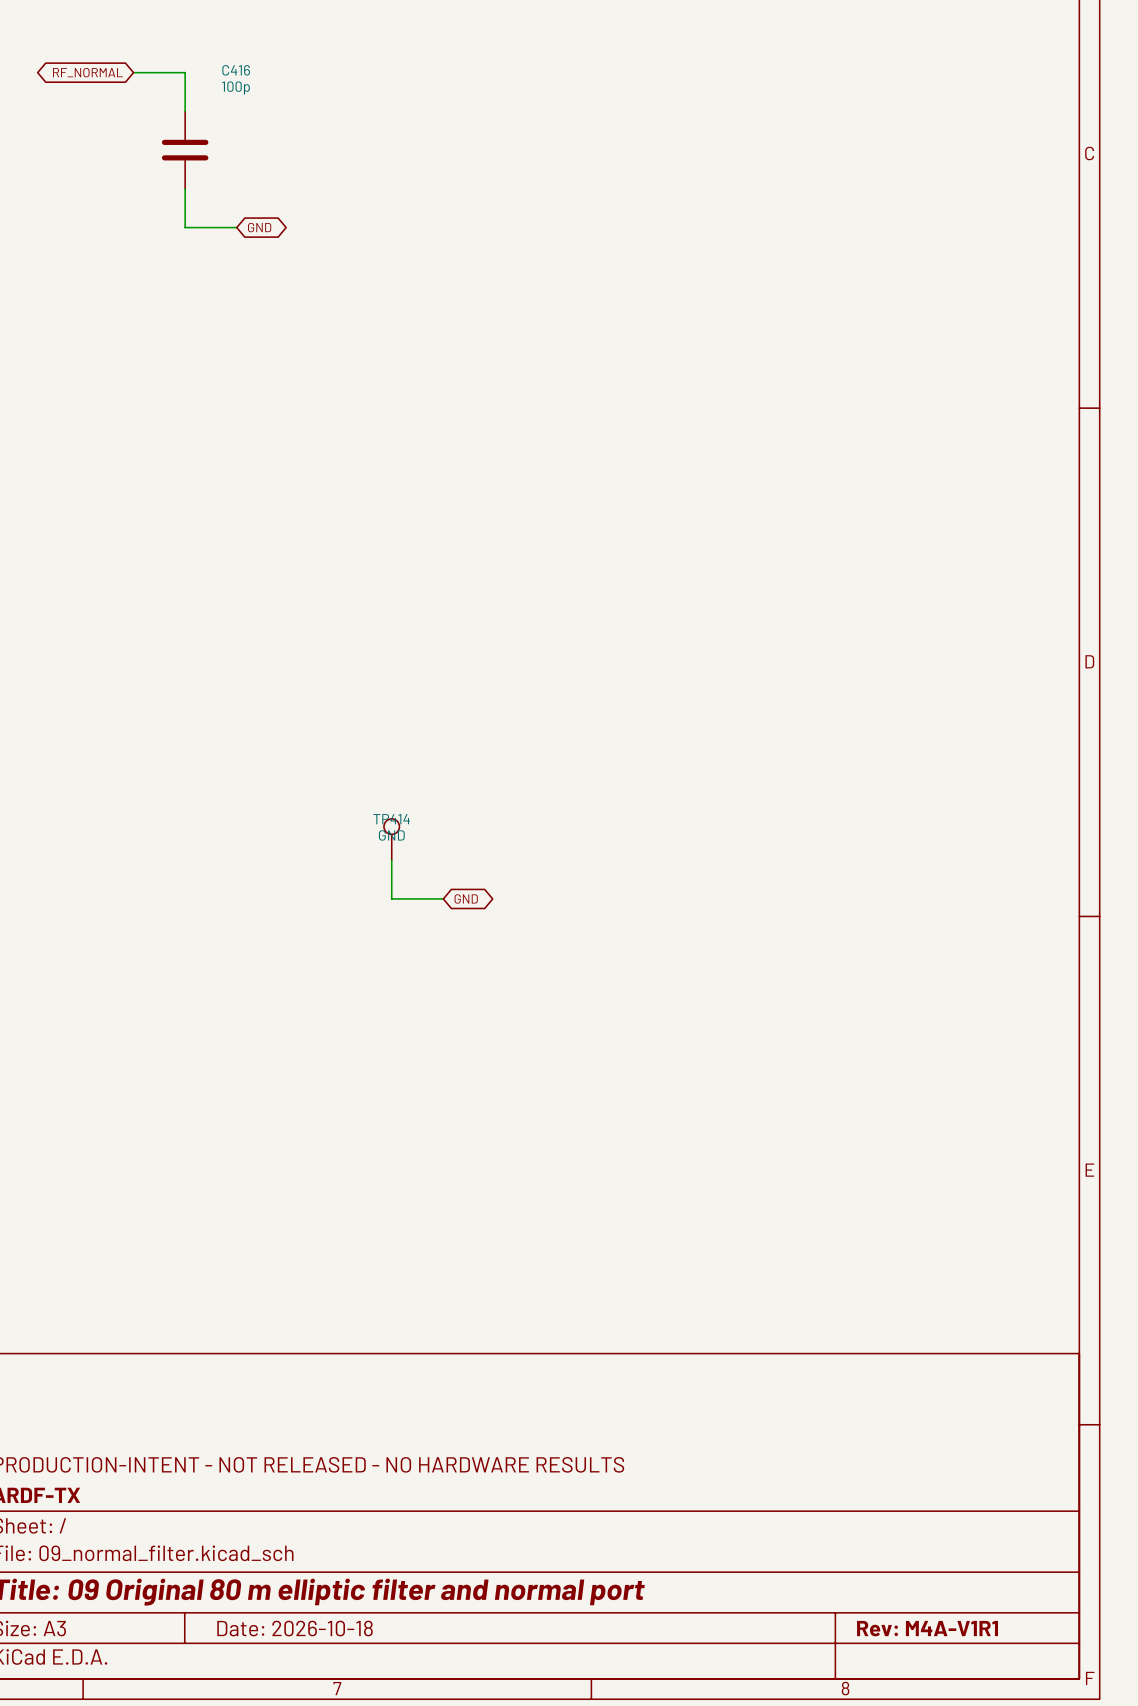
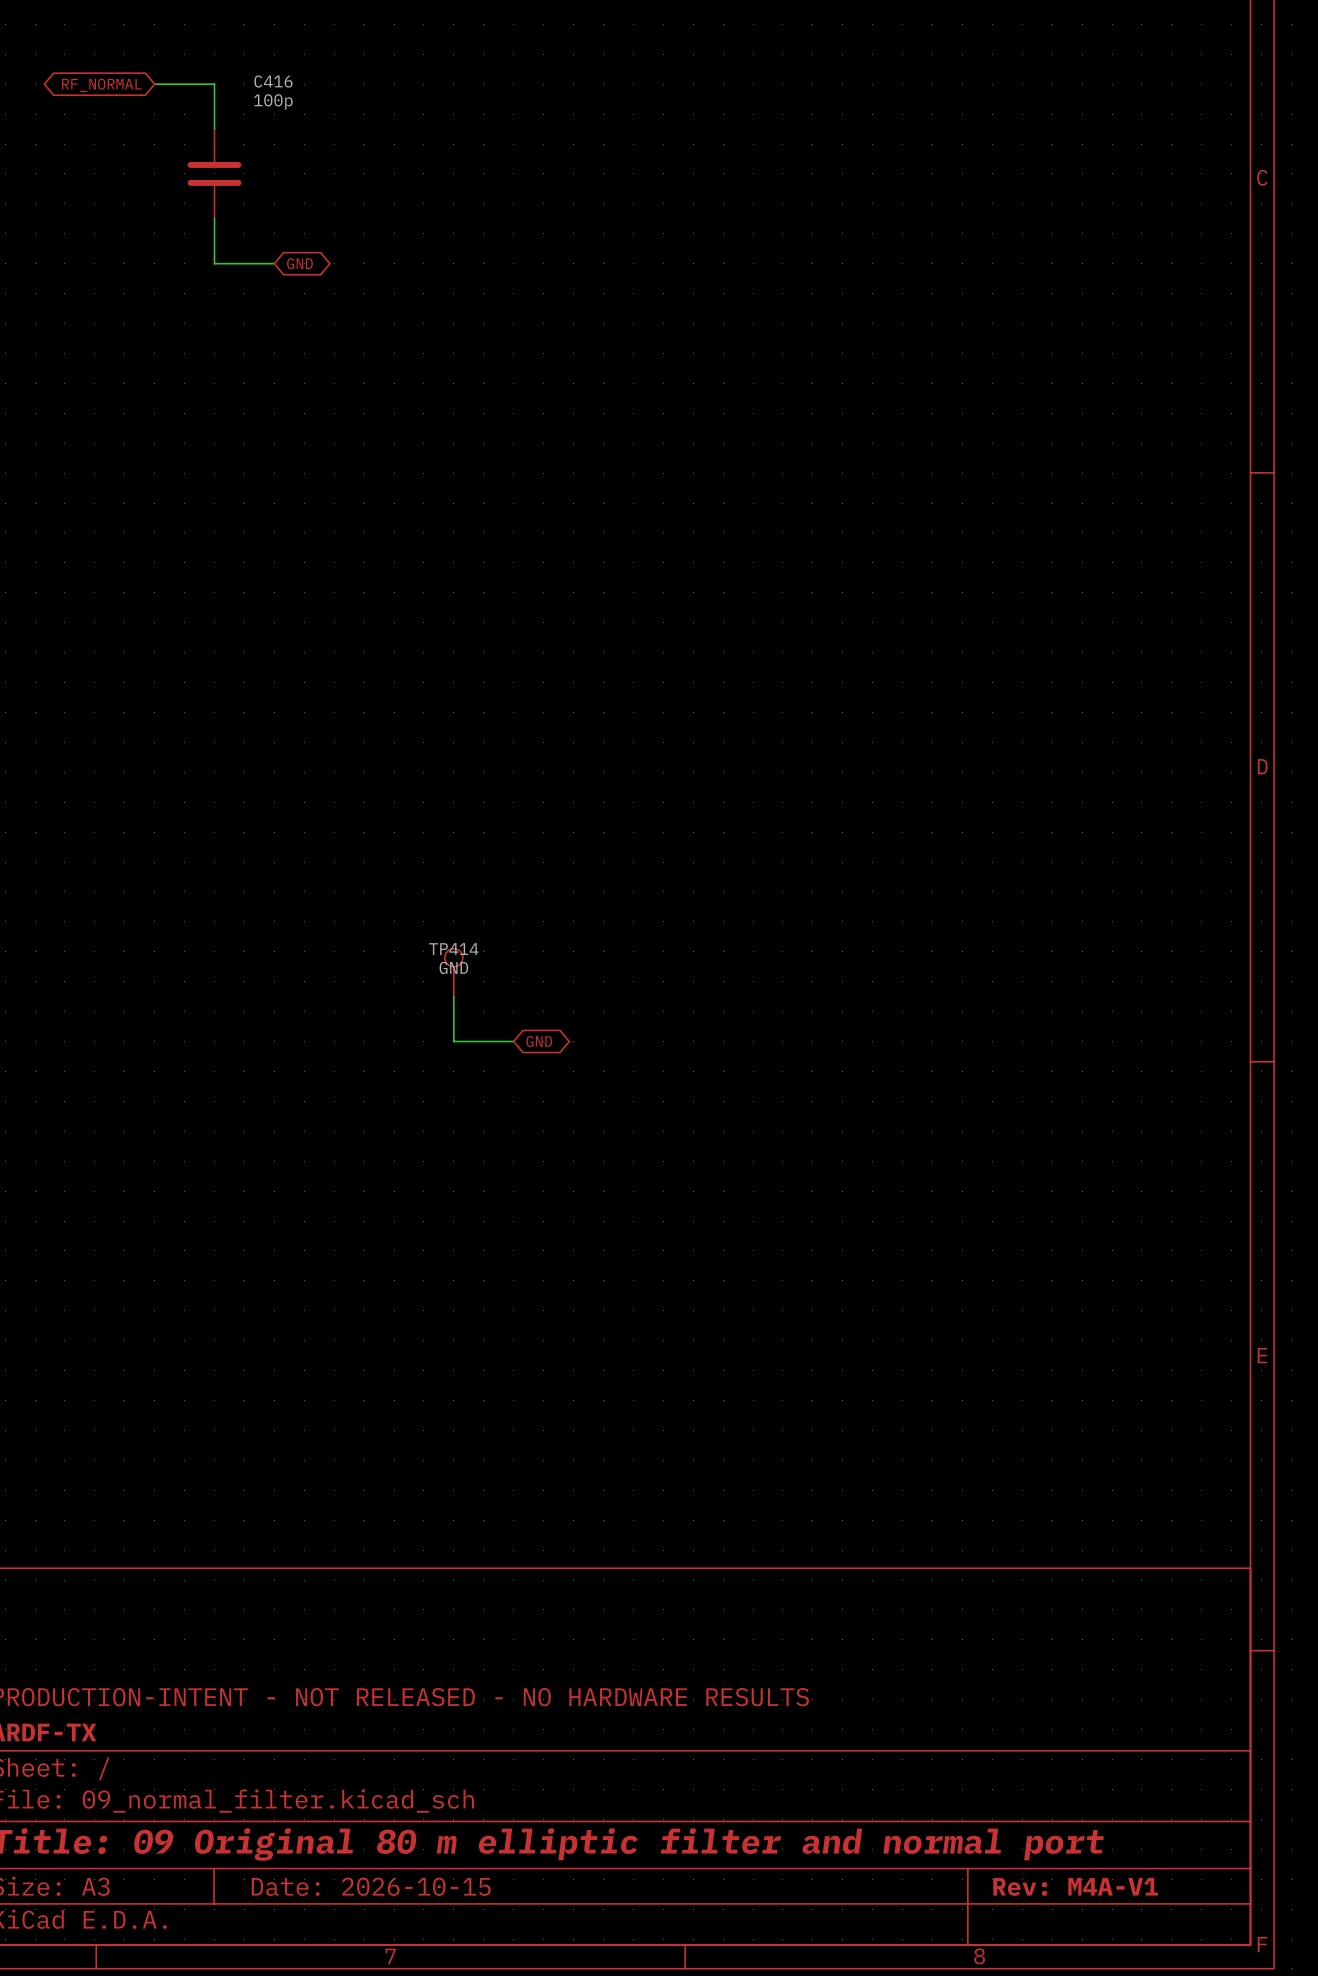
title block: Date: 2026-10-18 (295, 1628) -> Date: 2026-10-15 (371, 1886)
title block: Rev: M4A-V1R1 (927, 1628) -> Rev: M4A-V1 (1075, 1886)

